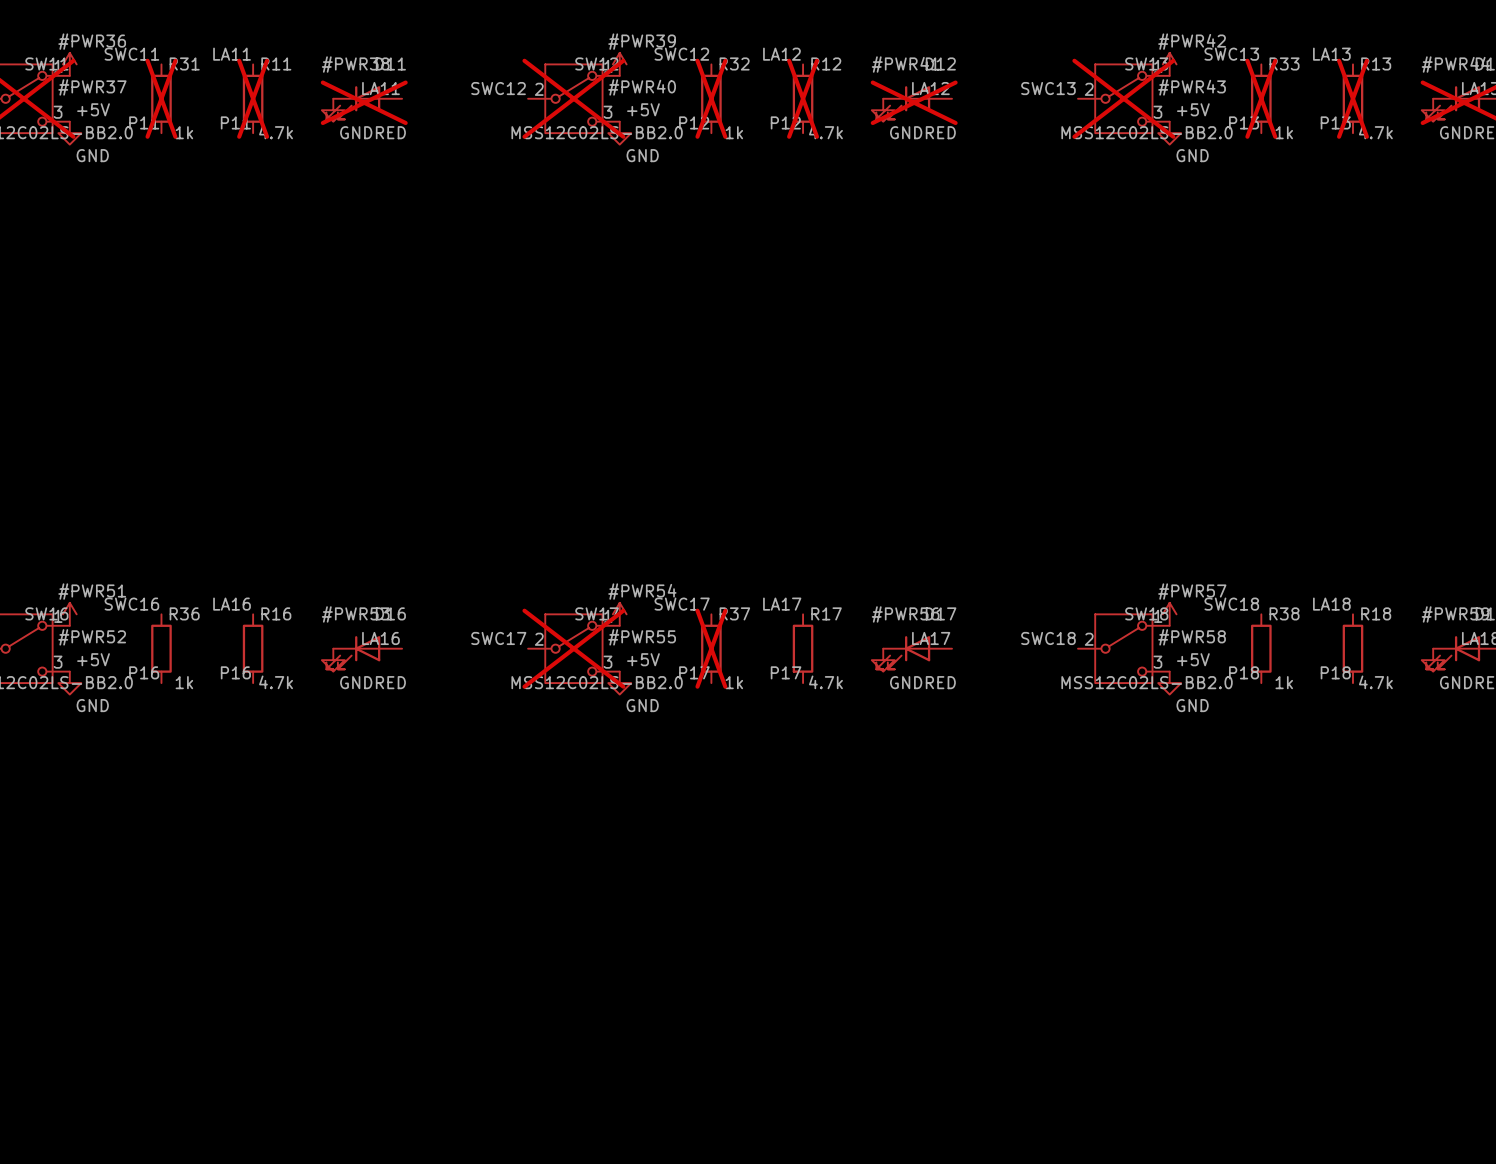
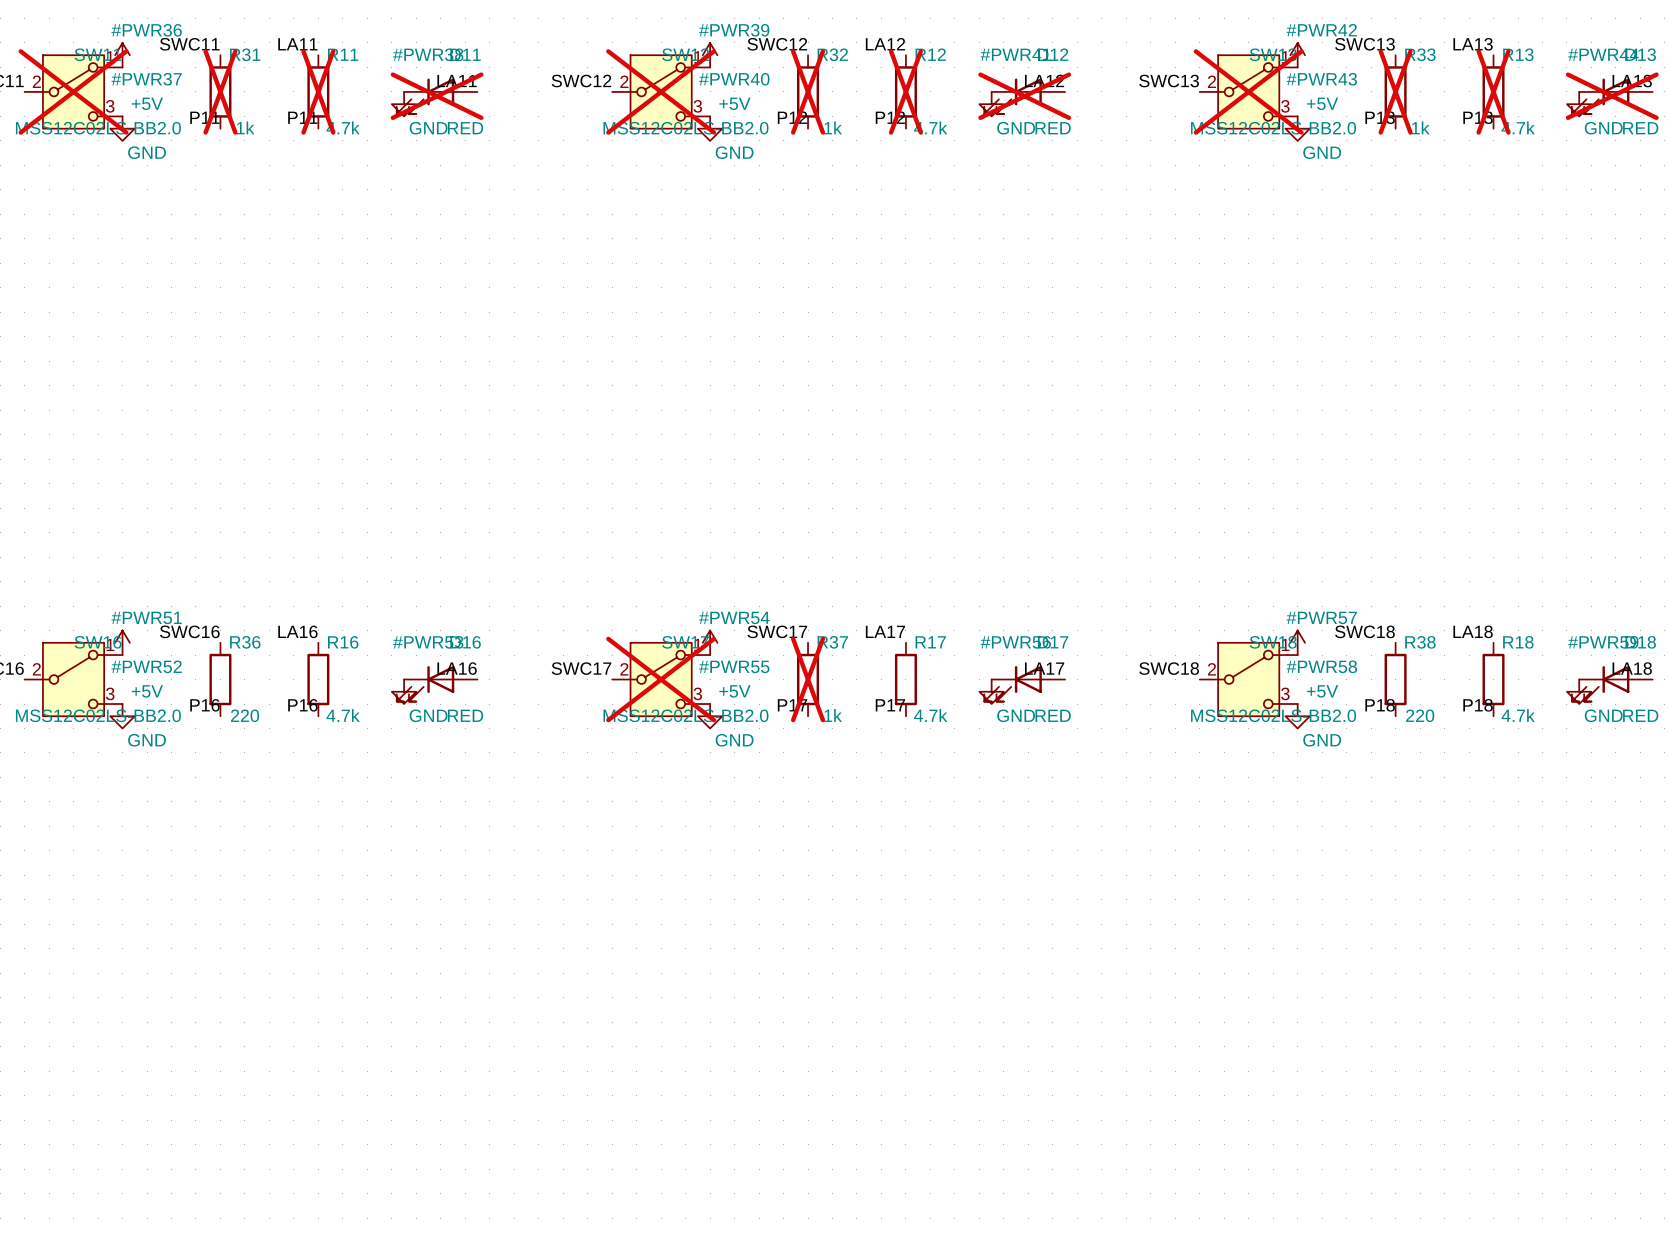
R36 value: 1k (184, 682) -> 220 (245, 715)
R38 value: 1k (1284, 682) -> 220 (1420, 715)

